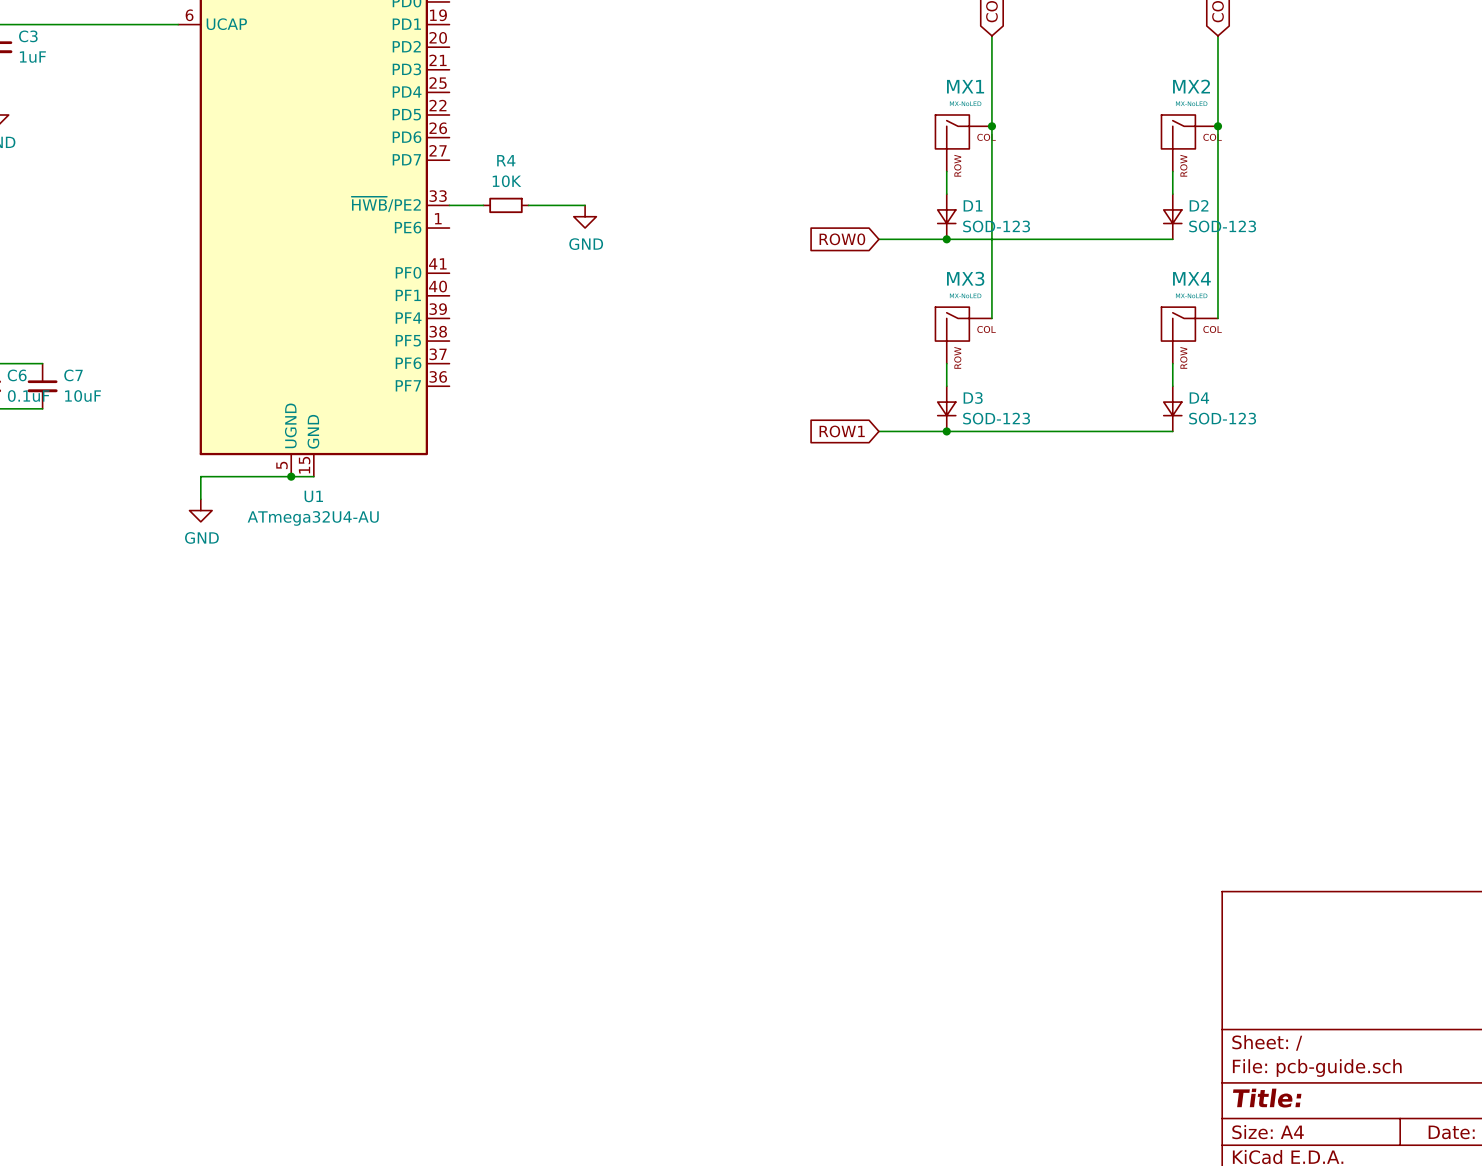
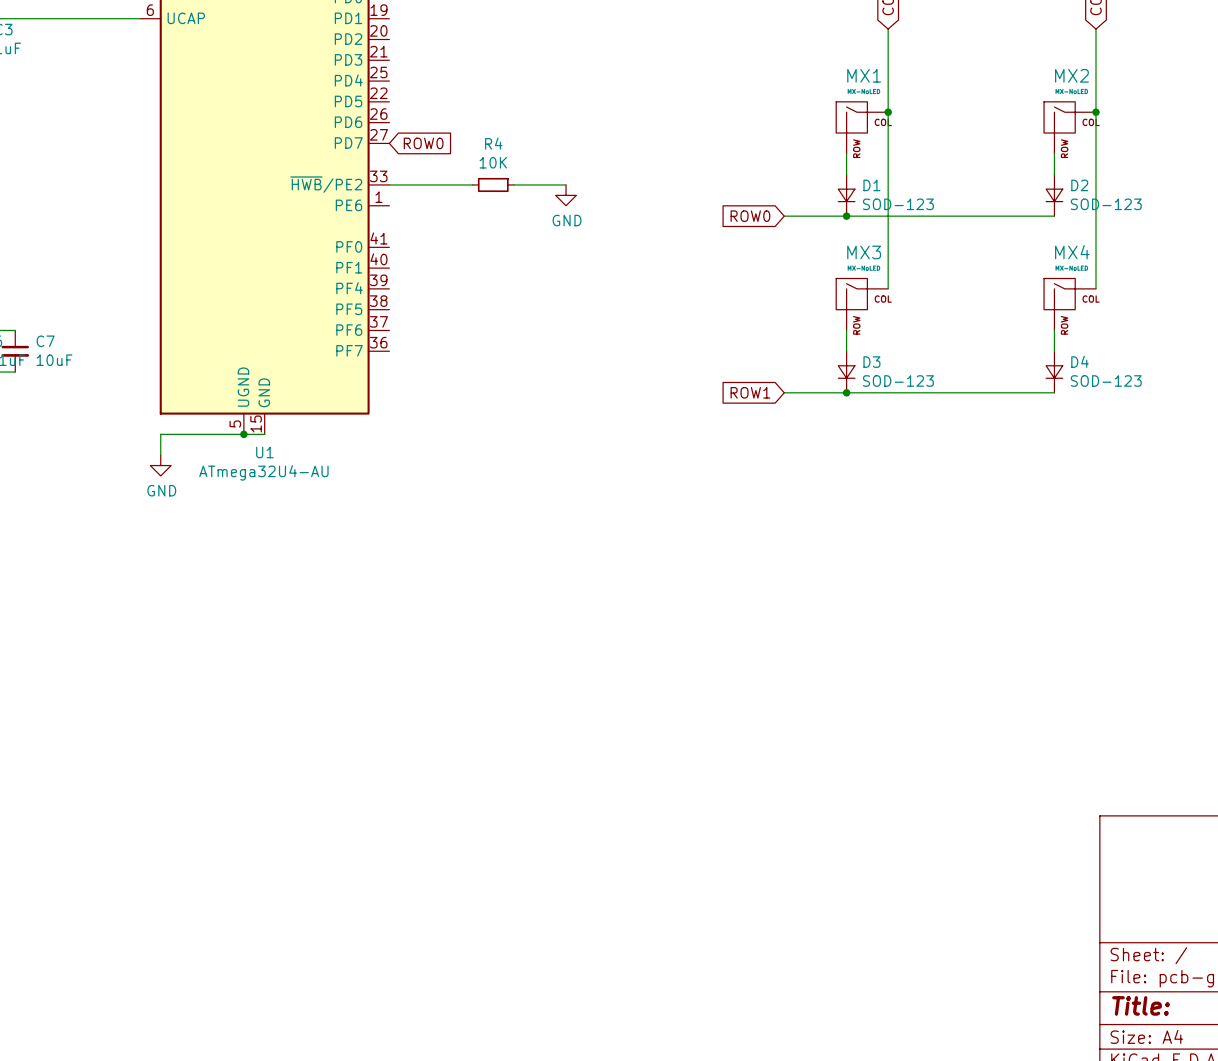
global label: none -> ROW0 (423, 143)
wire: none -> (420, 184) (462, 184)
R4 position: (505, 205) -> (493, 184)
wire: (539, 205) (585, 205) -> (566, 184) (514, 184)
power symbol position: GND (585, 216) -> GND (566, 195)

